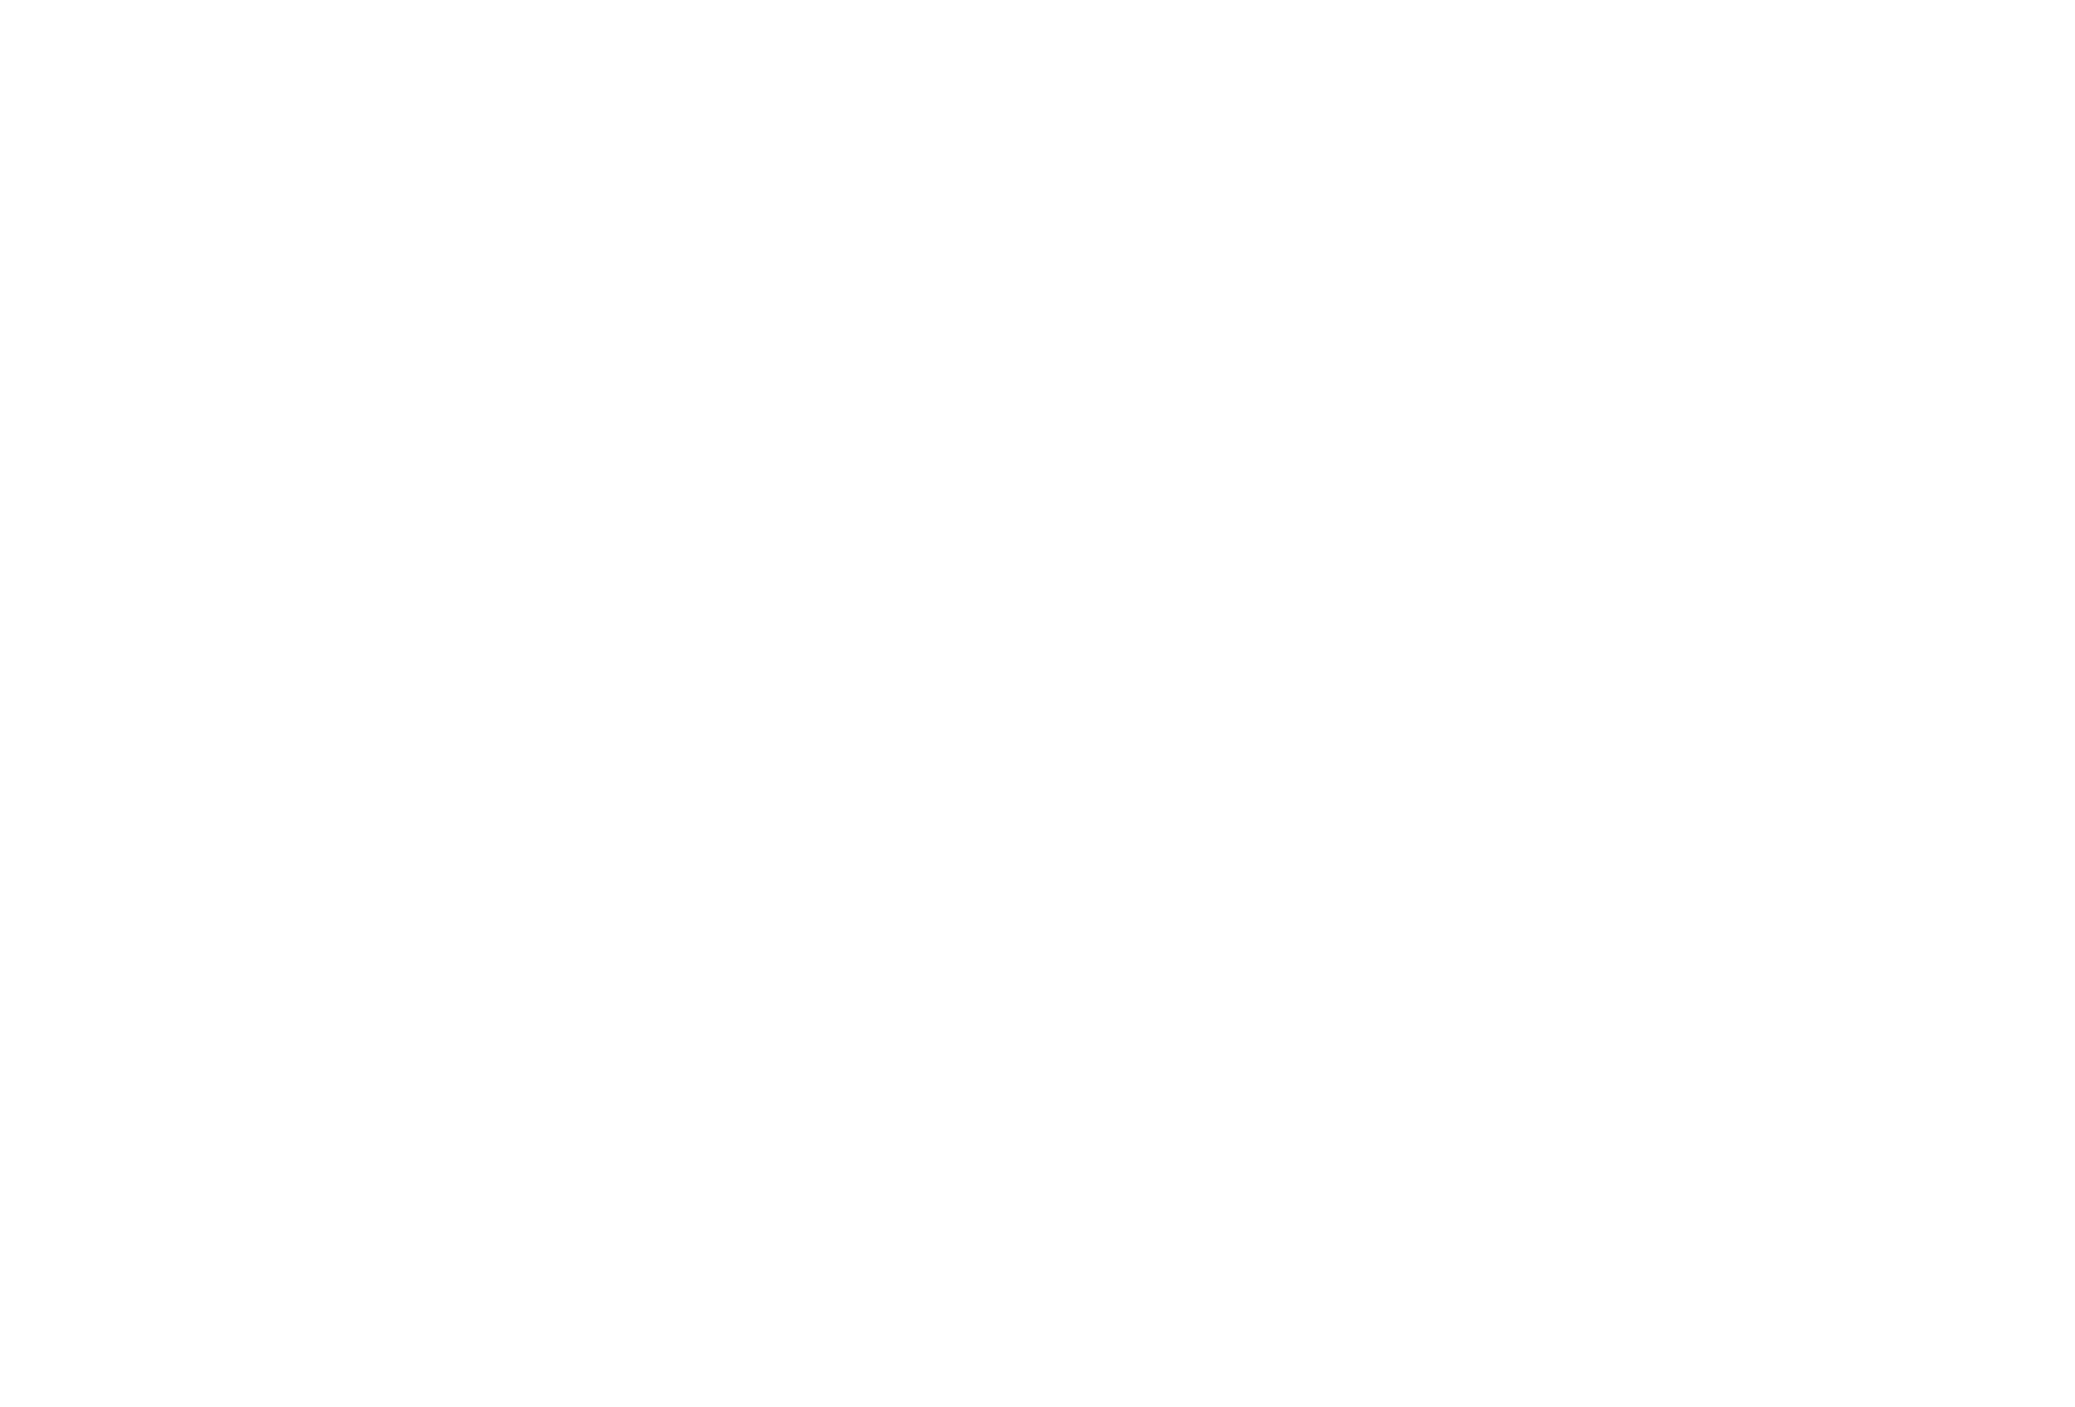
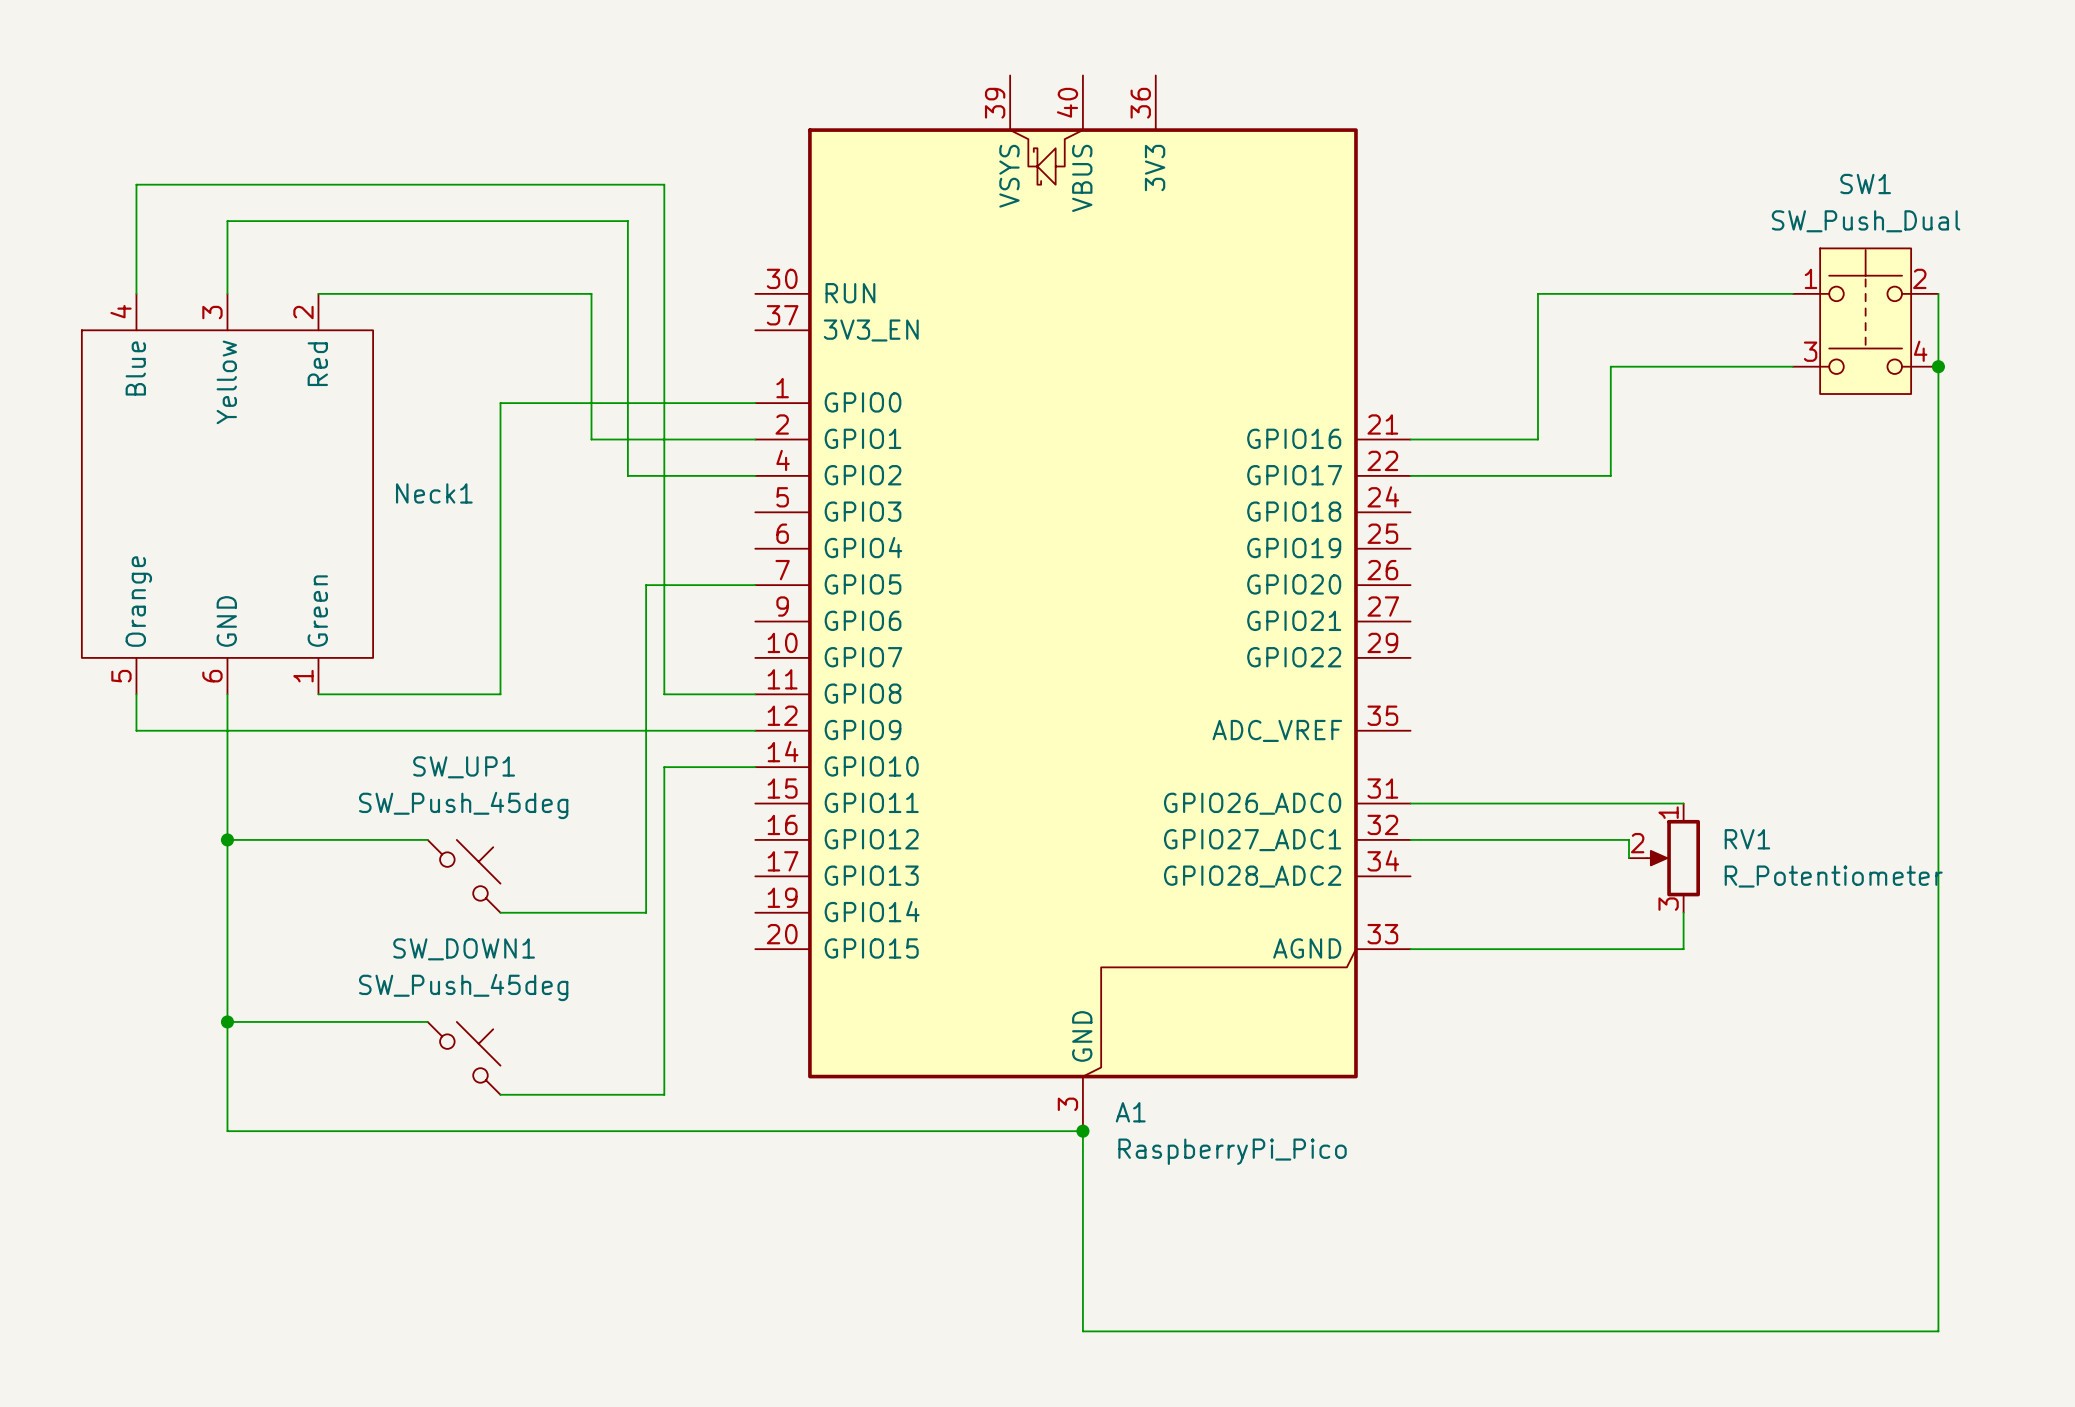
wire: none -> (136, 293) (136, 184) (664, 184) (664, 694) (755, 694)
wire: none -> (227, 293) (227, 221) (627, 221) (627, 475) (755, 475)
wire: none -> (318, 293) (591, 293) (591, 439) (755, 439)
wire: none -> (1792, 293) (1537, 293) (1537, 439) (1410, 439)
wire: none -> (1938, 293) (1938, 1331) (1082, 1331) (1082, 1131) (227, 1131) (227, 694)
SW1: none -> SW_Push_Dual (1865, 321)
wire: none -> (1792, 366) (1610, 366) (1610, 475) (1410, 475)
junction: none -> (1938, 366)
wire: none -> (755, 403) (500, 403) (500, 694) (318, 694)
Neck1: none -> (227, 494)
wire: none -> (755, 585) (646, 585) (646, 912) (500, 912)
A1: none -> RaspberryPi_Pico (1082, 603)
wire: none -> (136, 694) (136, 730) (755, 730)
wire: none -> (755, 767) (664, 767) (664, 1094) (500, 1094)
wire: none -> (1410, 803) (1683, 803)
wire: none -> (227, 839) (427, 839)
junction: none -> (227, 839)
wire: none -> (1410, 839) (1628, 839) (1628, 858)
RV1: none -> R_Potentiometer (1664, 858)
SW_UP1: none -> SW_Push_45deg (464, 876)
wire: none -> (1683, 912) (1683, 949) (1410, 949)
wire: none -> (227, 1021) (427, 1021)
junction: none -> (227, 1021)
SW_DOWN1: none -> SW_Push_45deg (464, 1058)
junction: none -> (1082, 1131)

